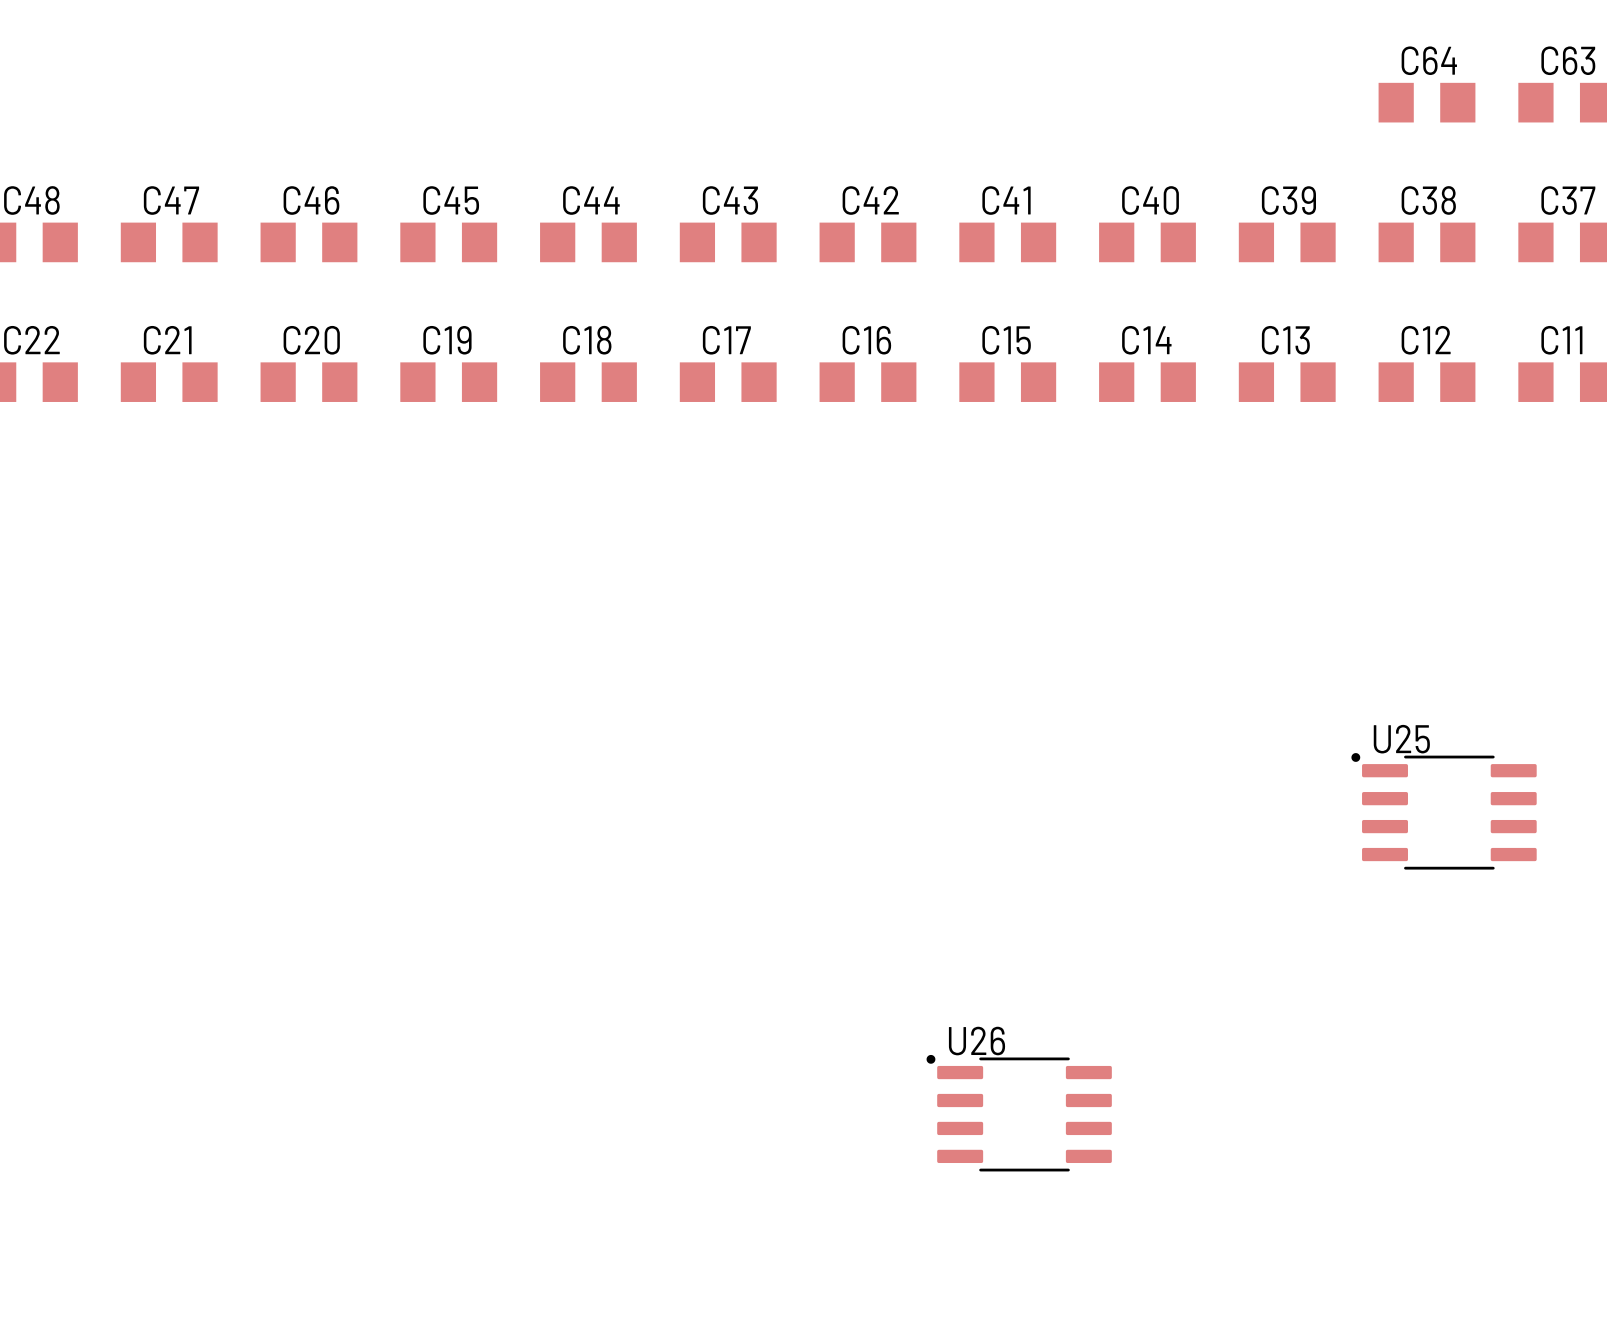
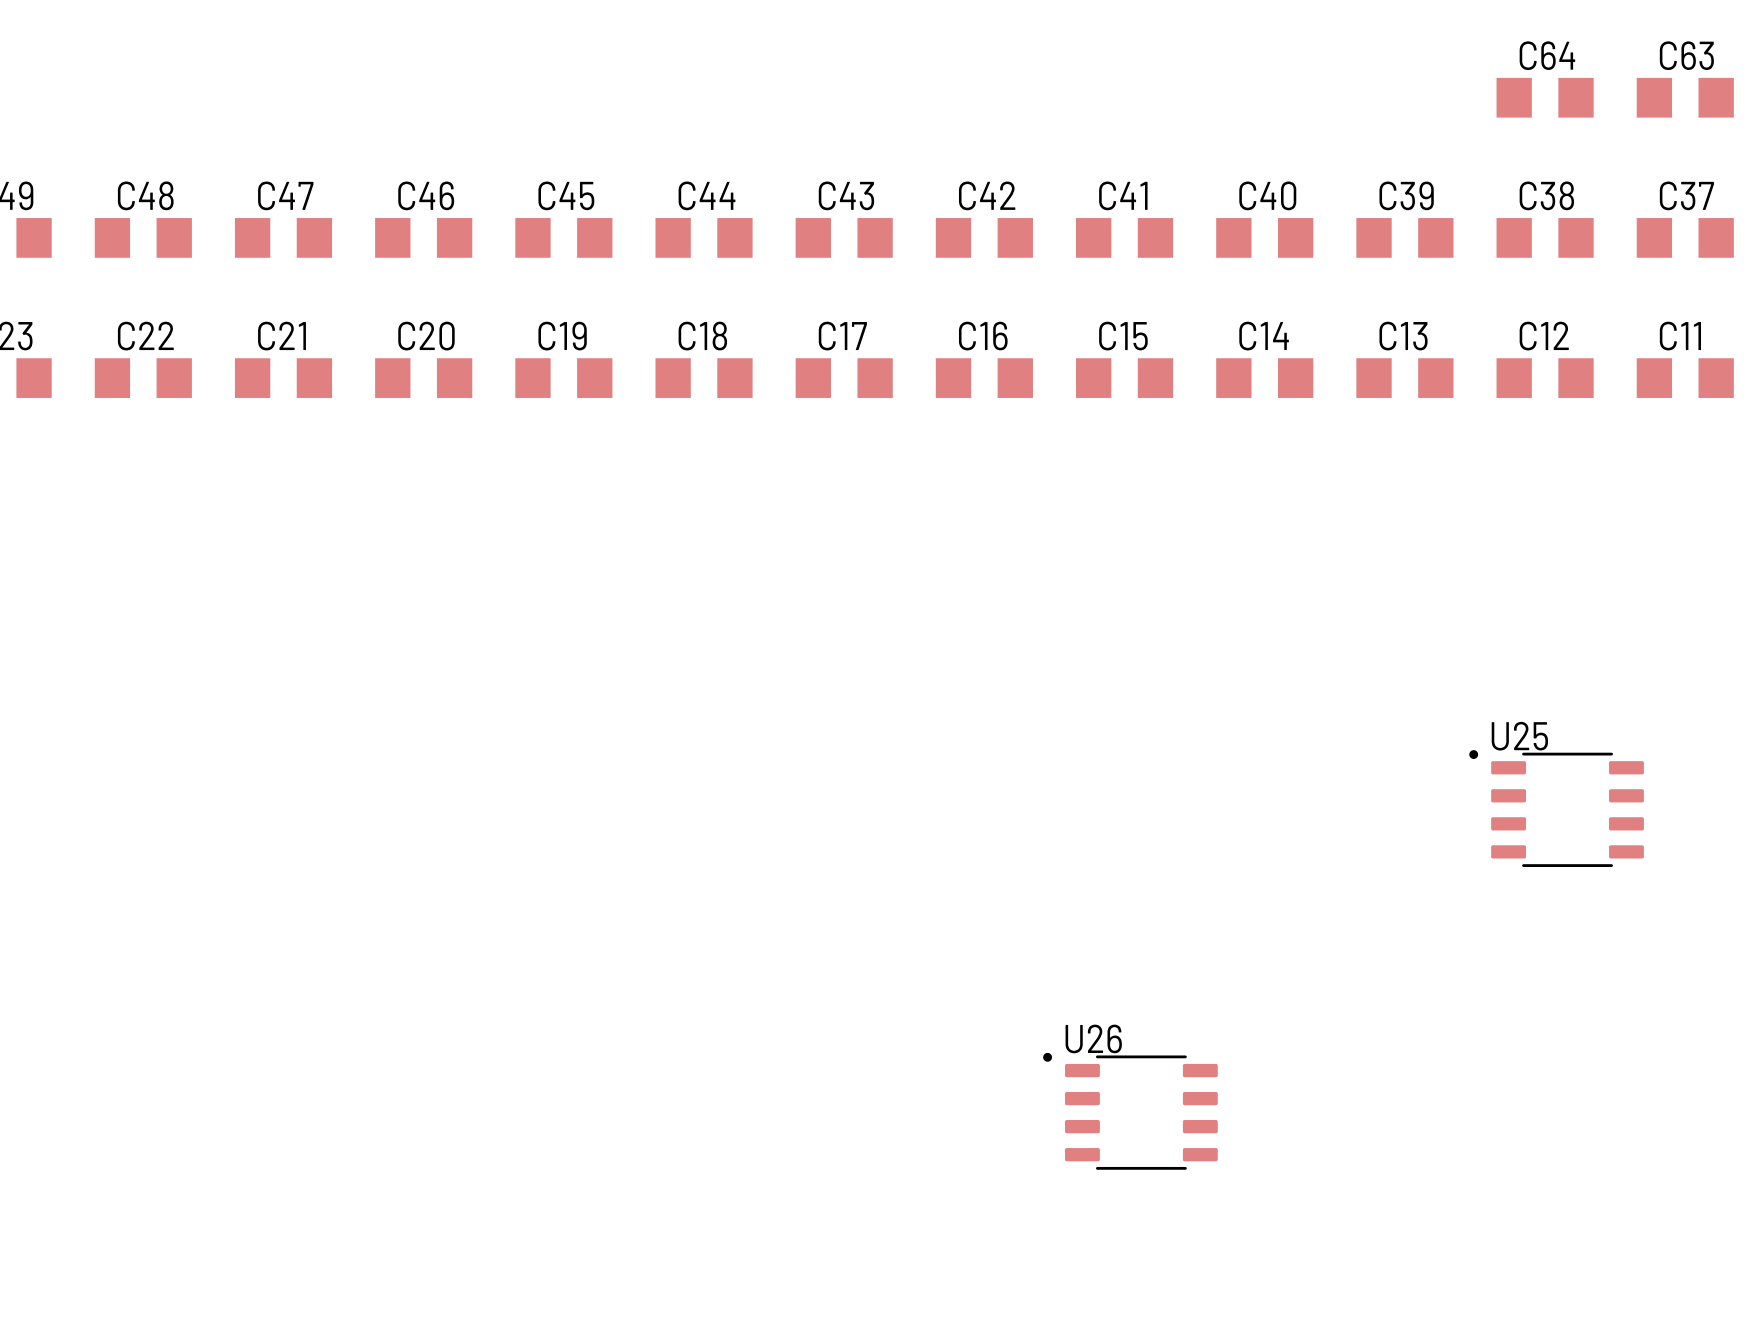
U25 footprint: [1351, 753, 1537, 870] -> [1469, 750, 1644, 867]
U26 footprint: [926, 1054, 1112, 1172] -> [1043, 1052, 1218, 1170]

